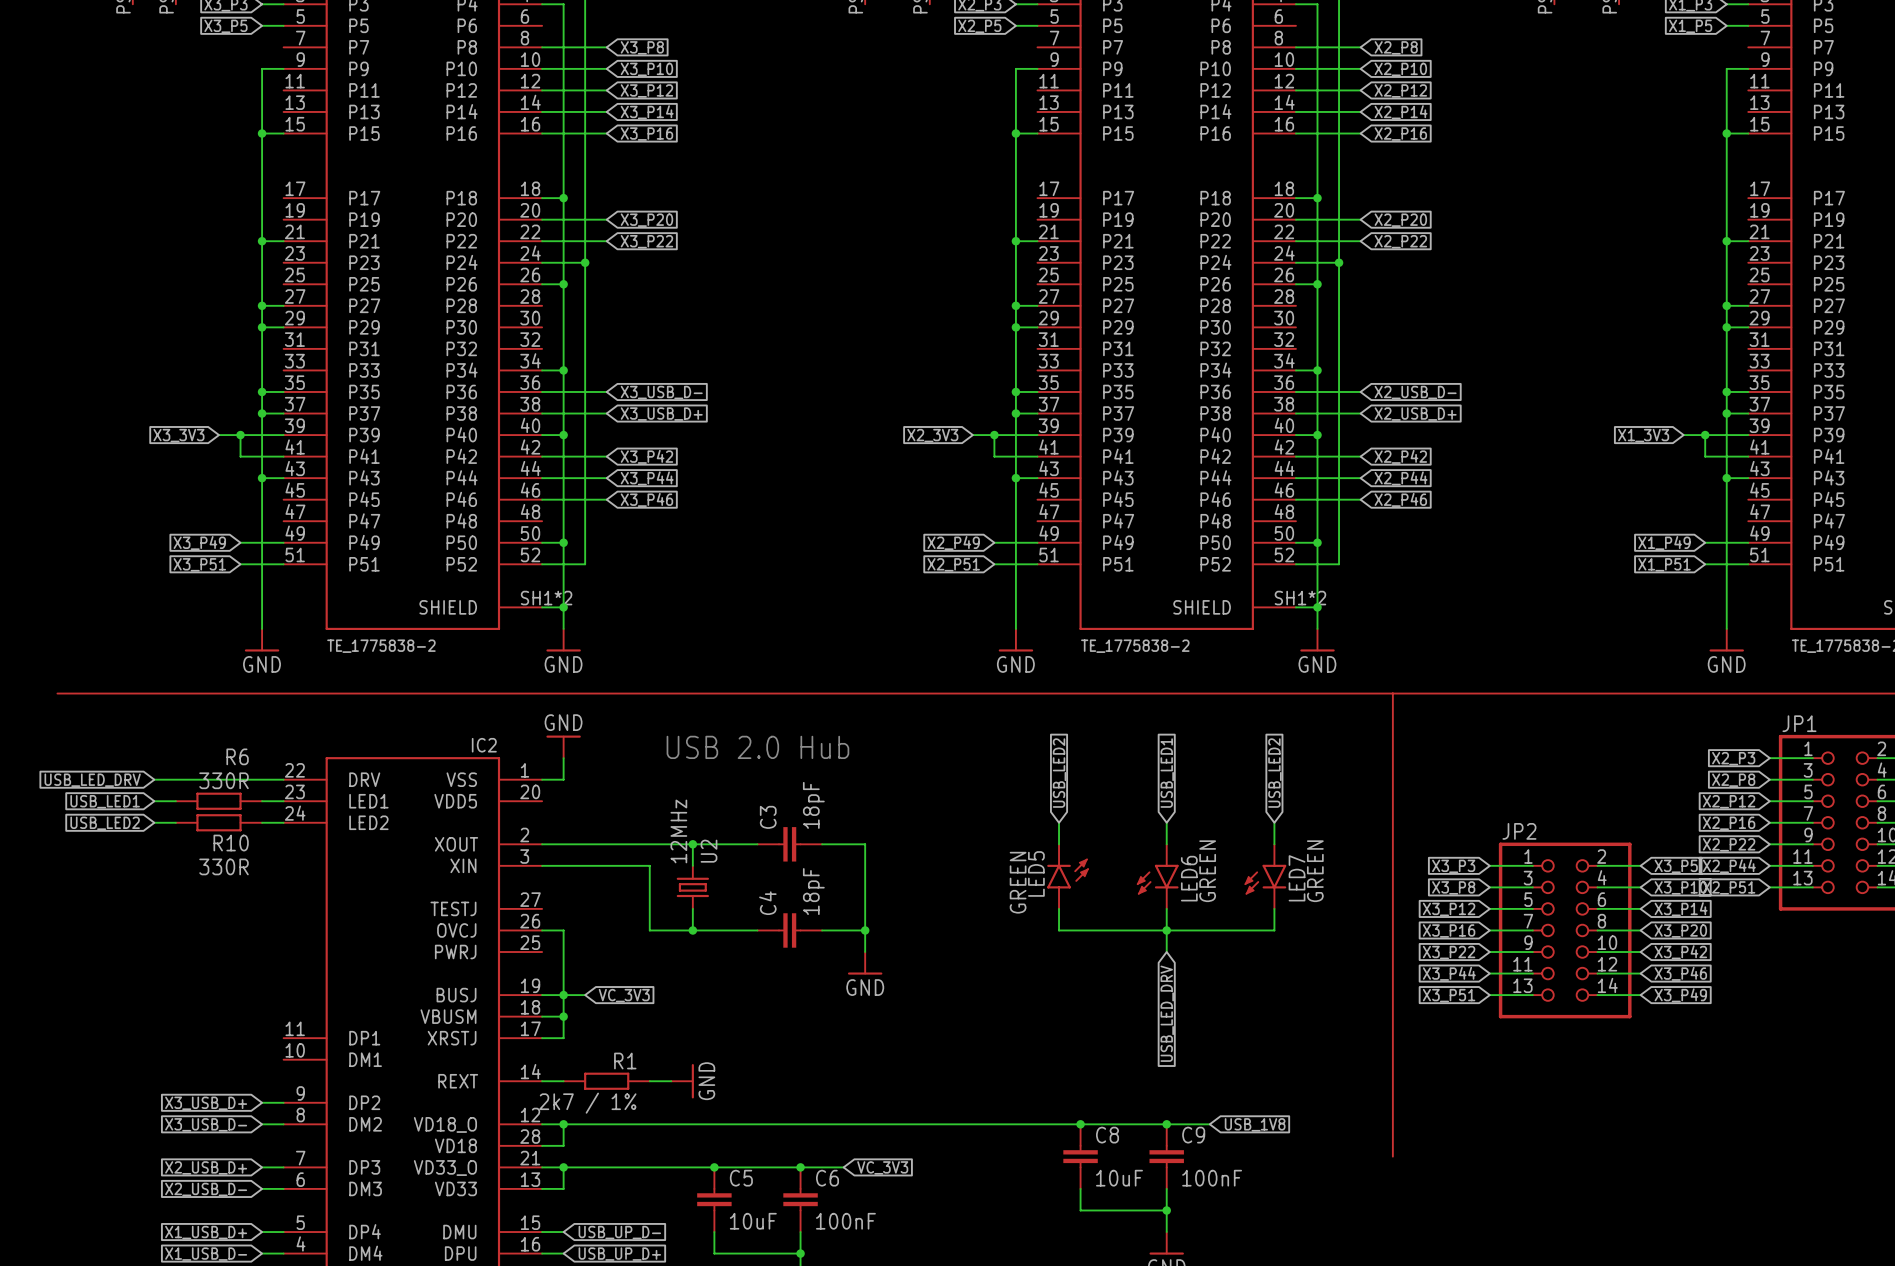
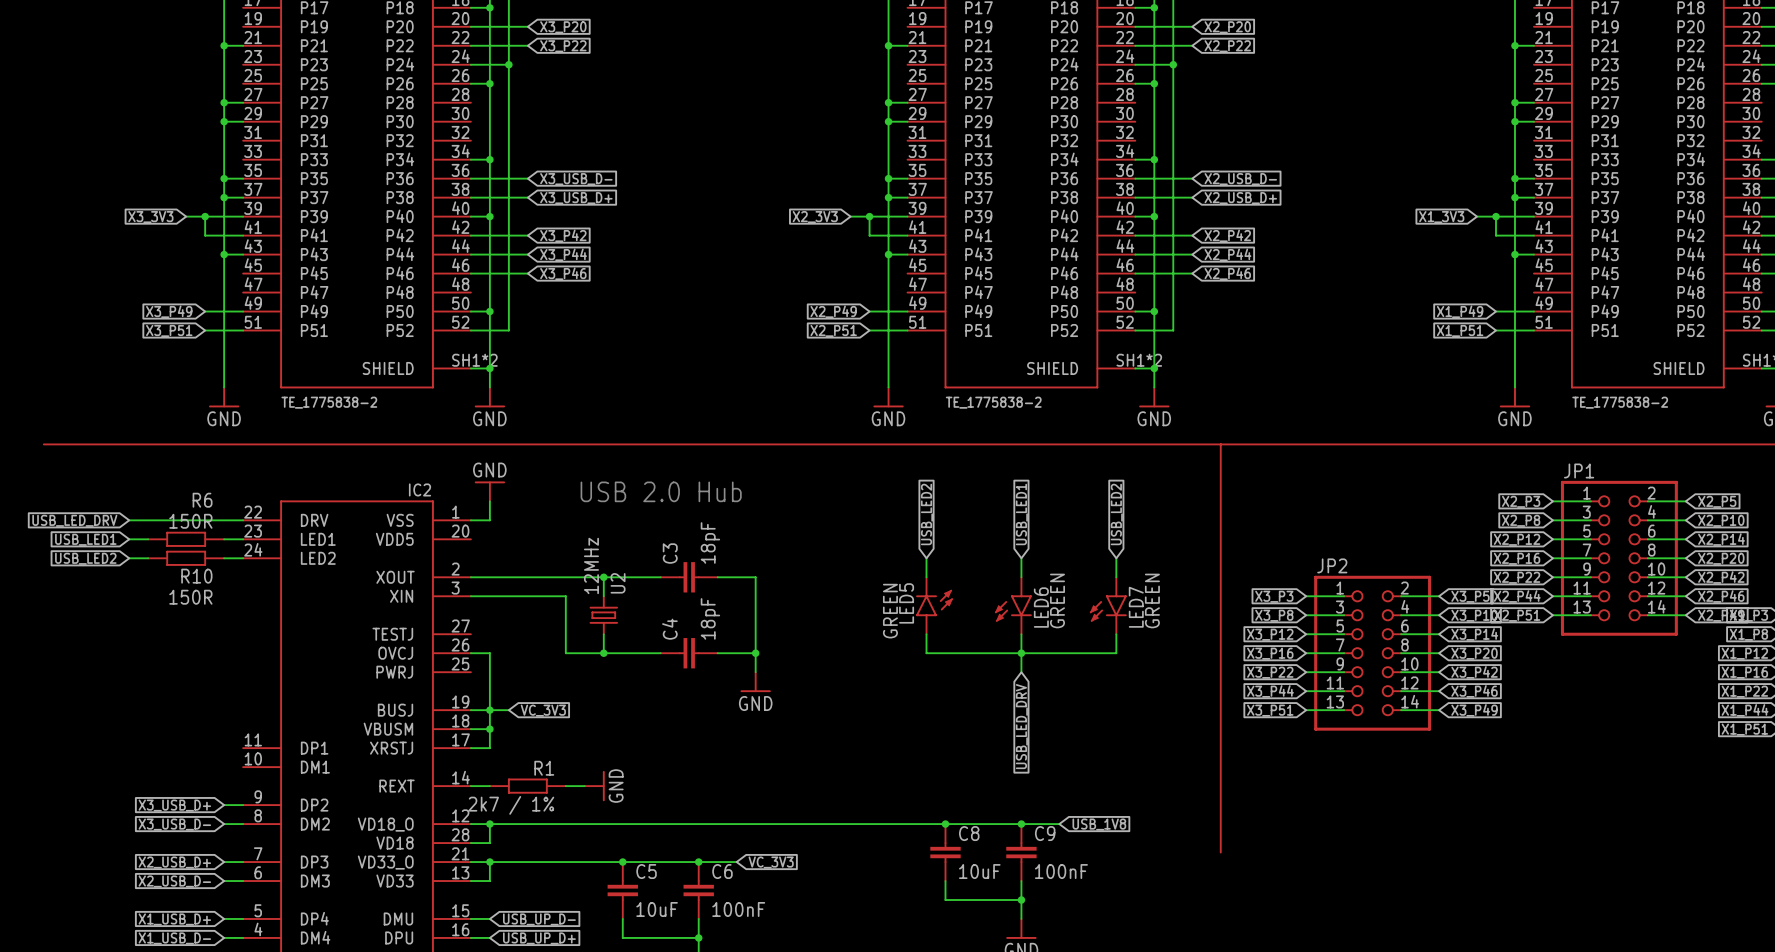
R6 value: 330R (224, 780) -> 150R (190, 521)
R10 value: 330R (224, 866) -> 150R (190, 597)

